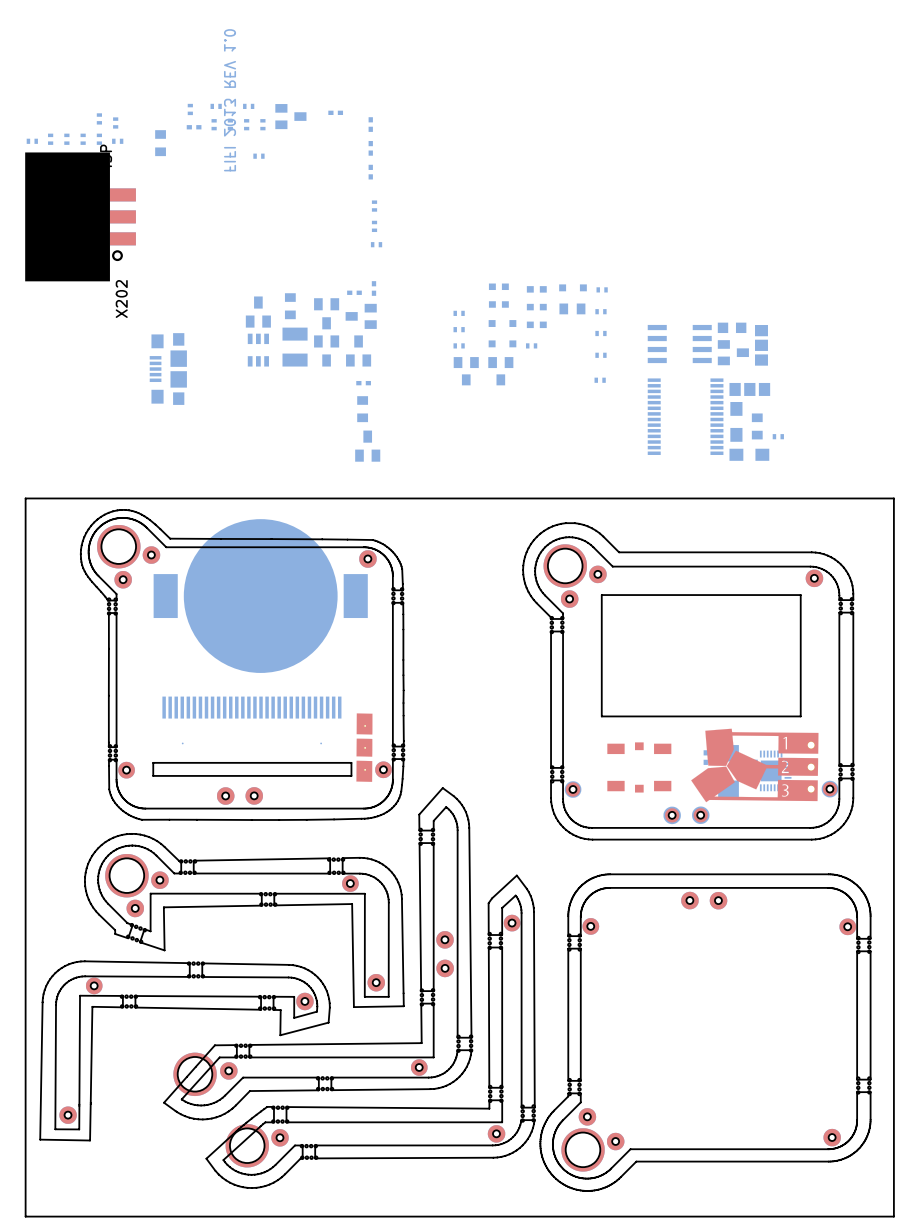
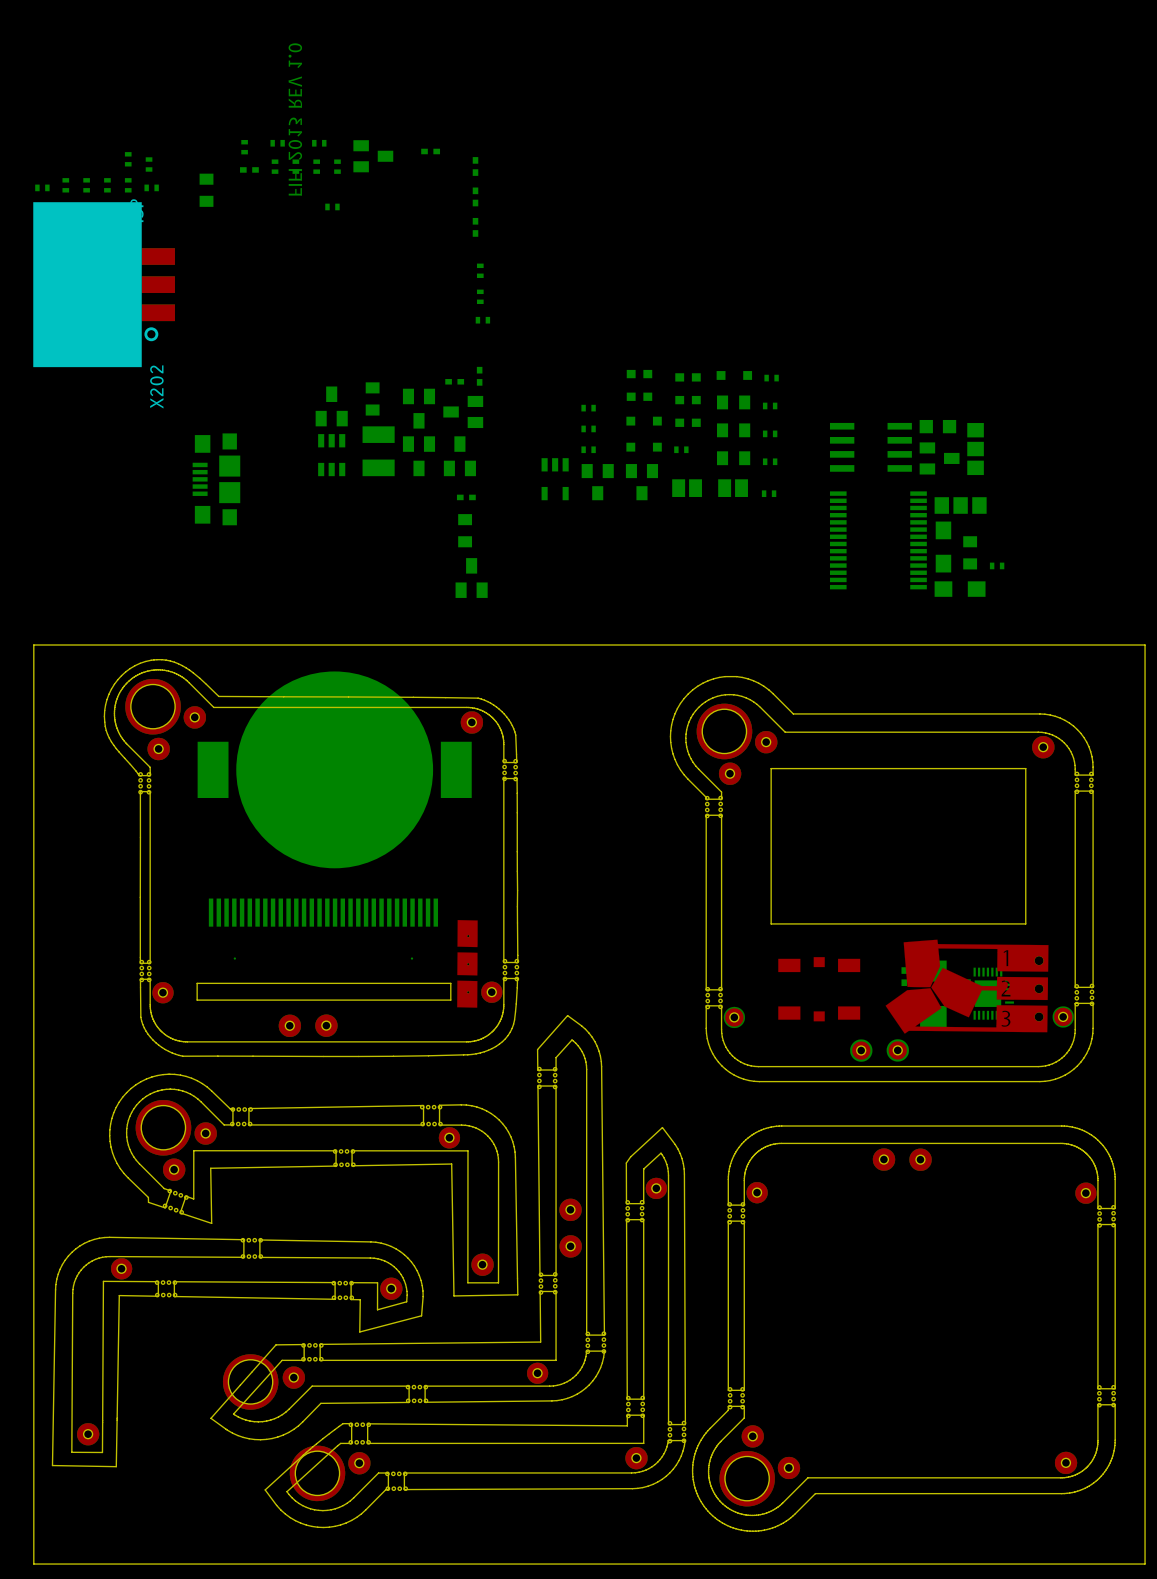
part: none -> (733, 430)
part: none -> (733, 458)
part: none -> (555, 479)
part: none -> (687, 488)
part: none -> (733, 488)

